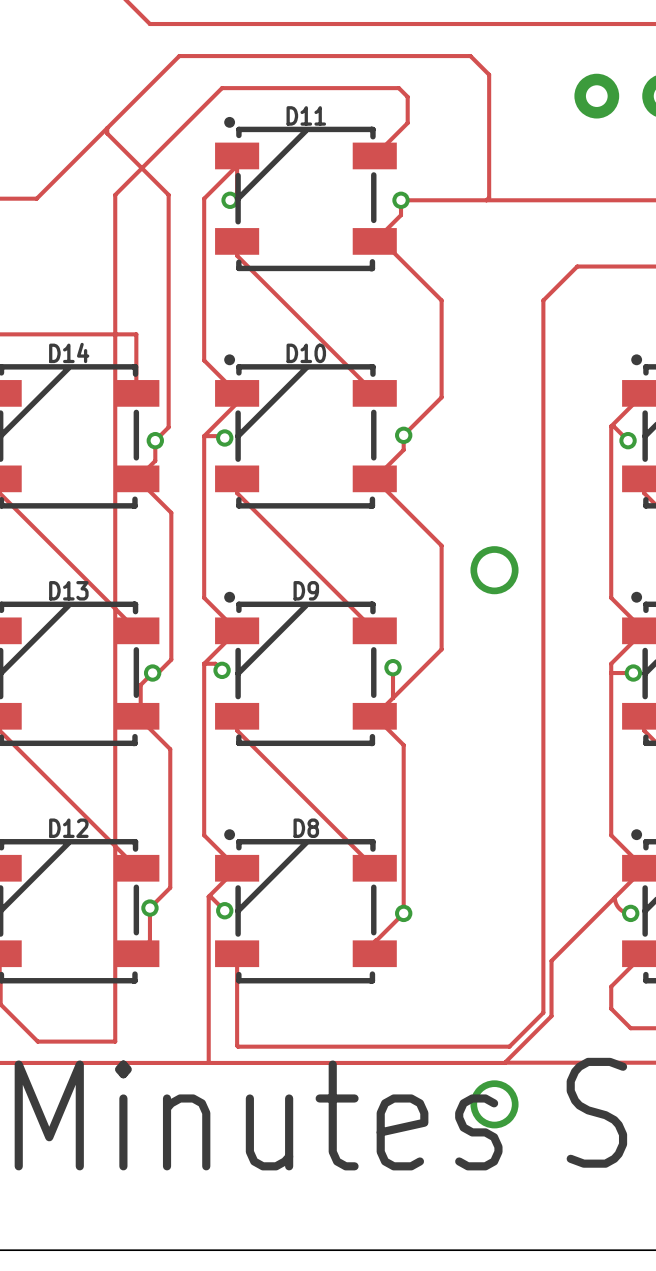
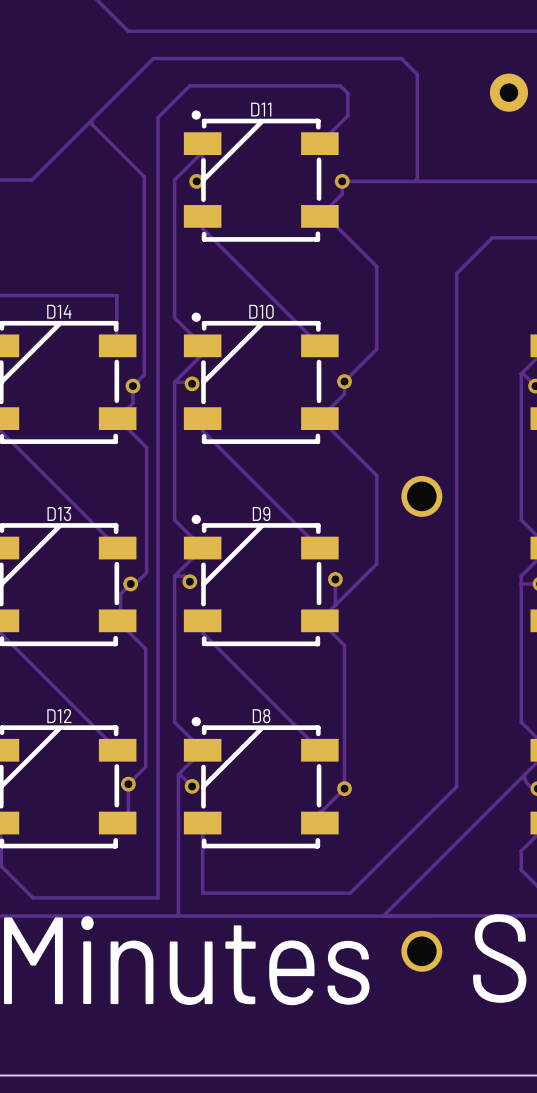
track: (184, 125) (115, 194) (115, 1041) -> (157, 117) (157, 897) (98, 897)
track: (543, 300) (543, 1012) (509, 1046) (238, 1046) (237, 1035) -> (463, 266) (456, 273) (456, 786) (350, 893) (202, 893)
track: (551, 960) (551, 1016) (504, 1062) -> (470, 829) (383, 915) (430, 915)

